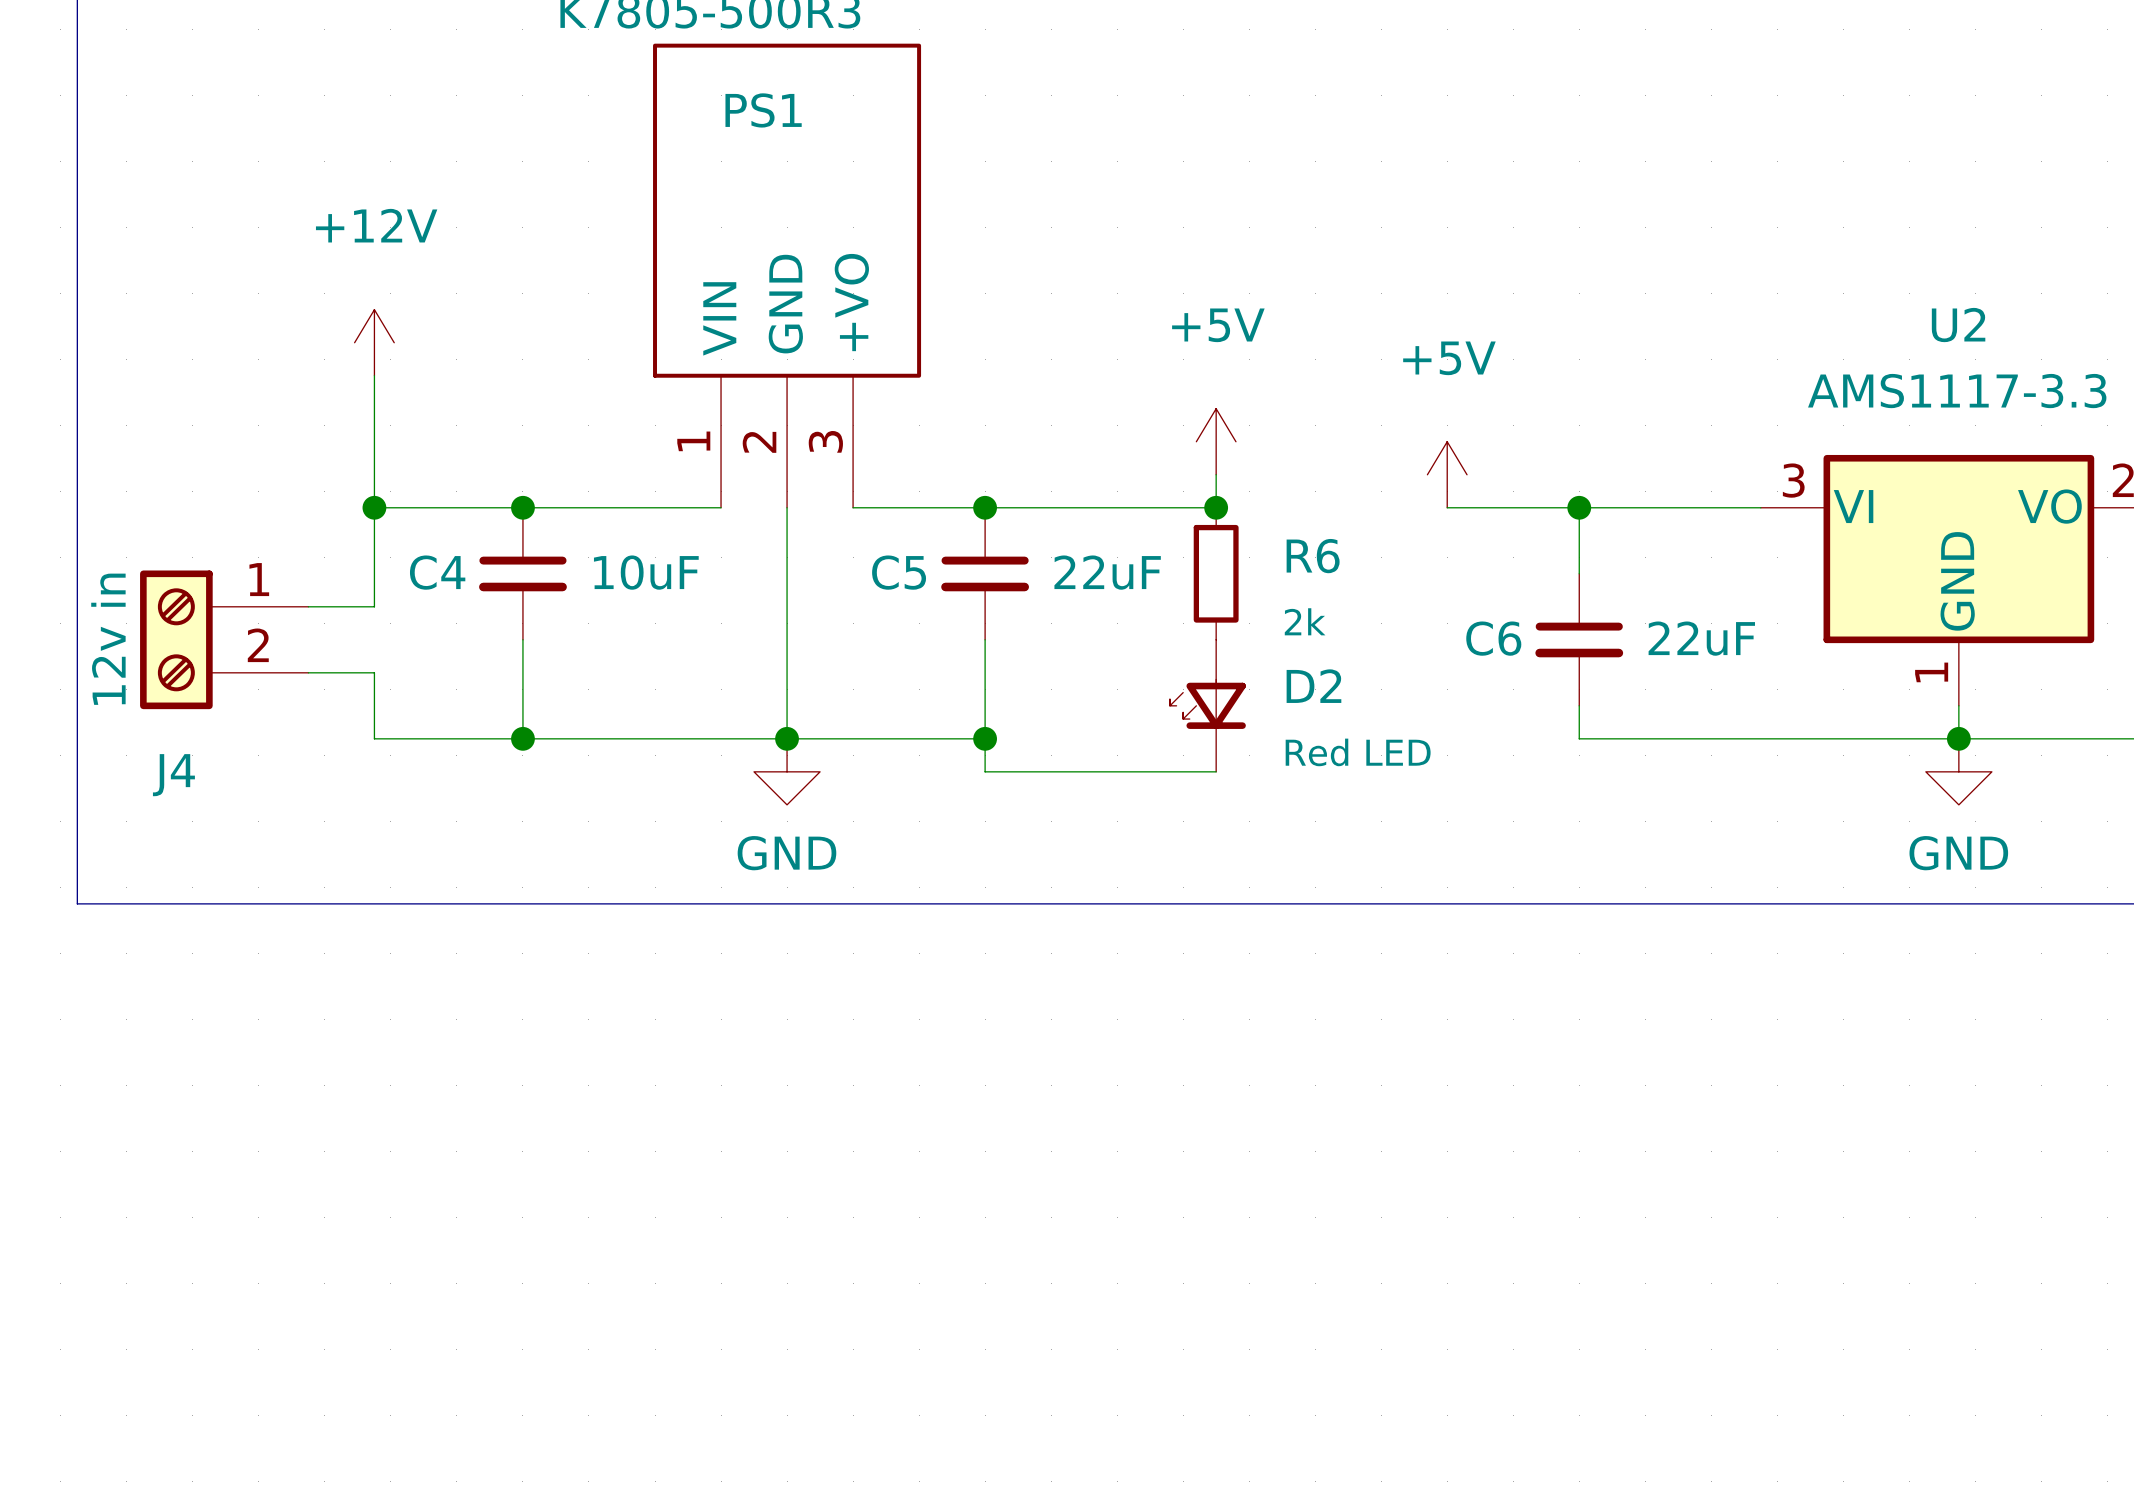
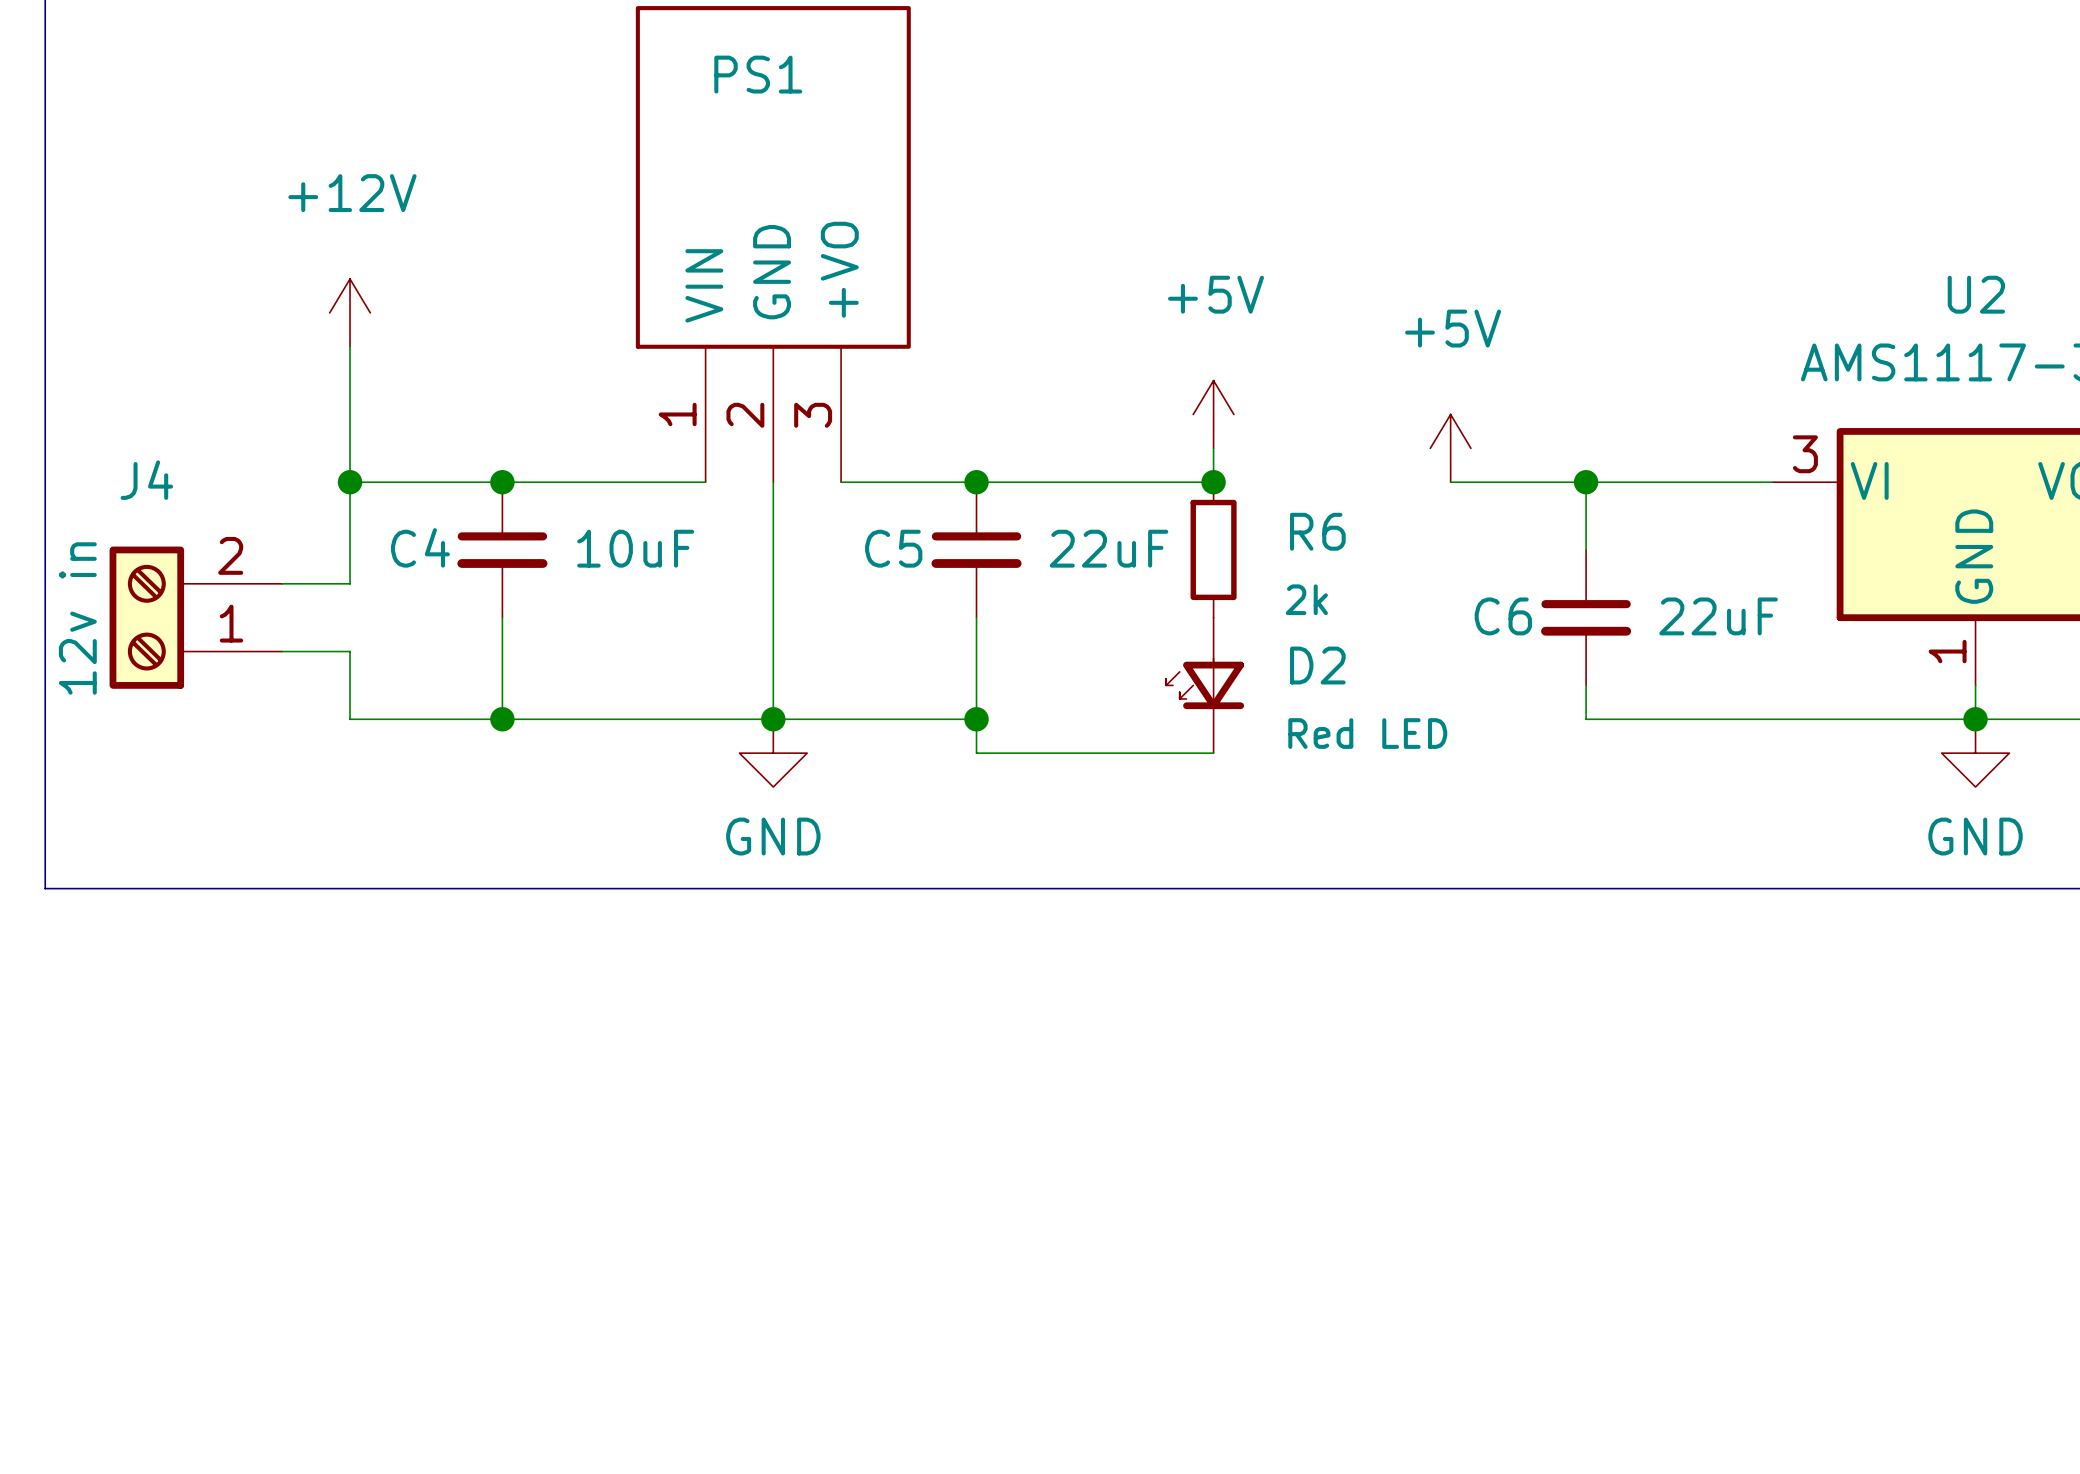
J4 flip: as is (176, 639) -> up-down (146, 617)

